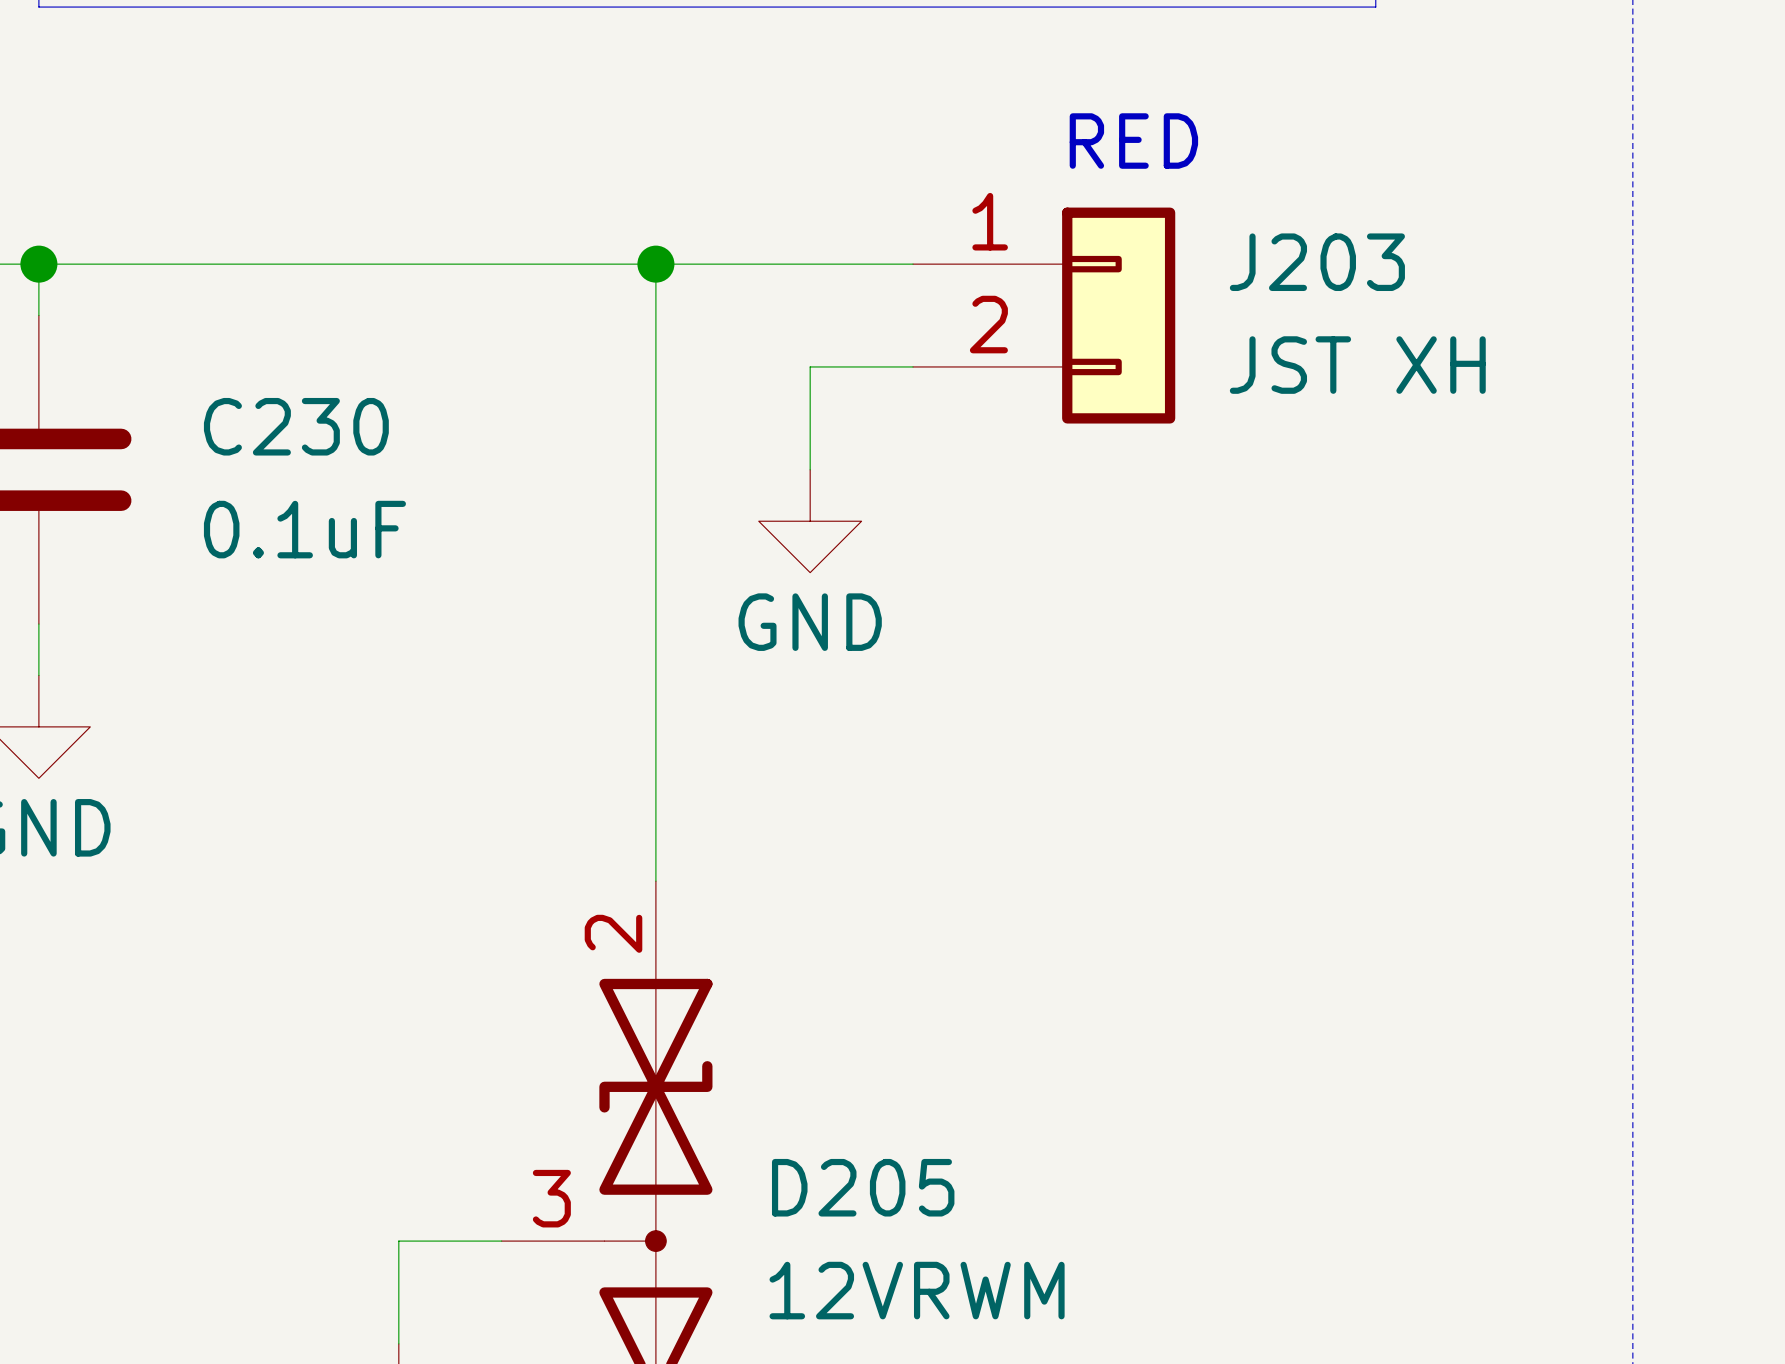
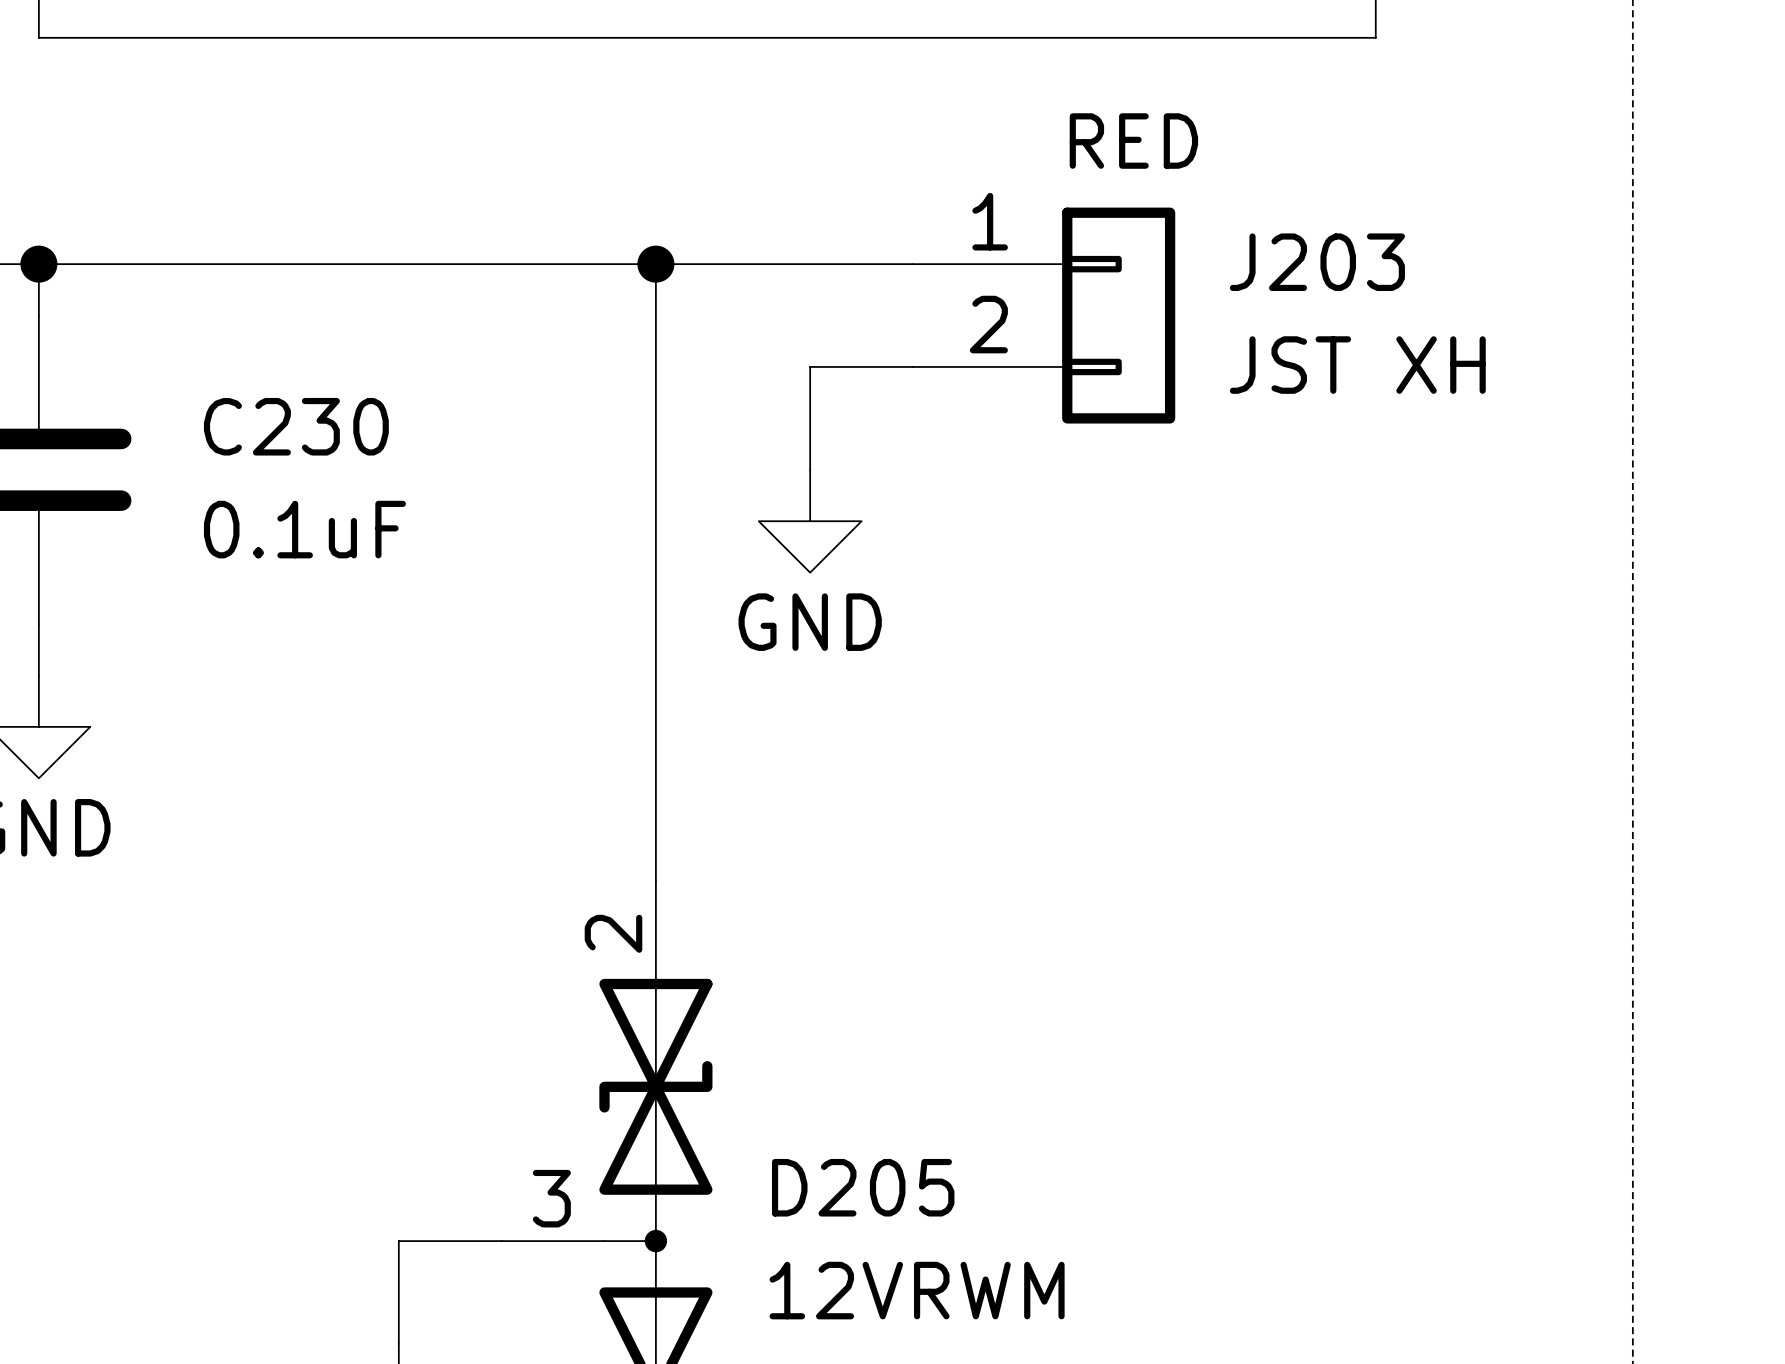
line: (38, 7) (1375, 7) -> (38, 7) (38, 37) (1375, 37) (1375, 7)

